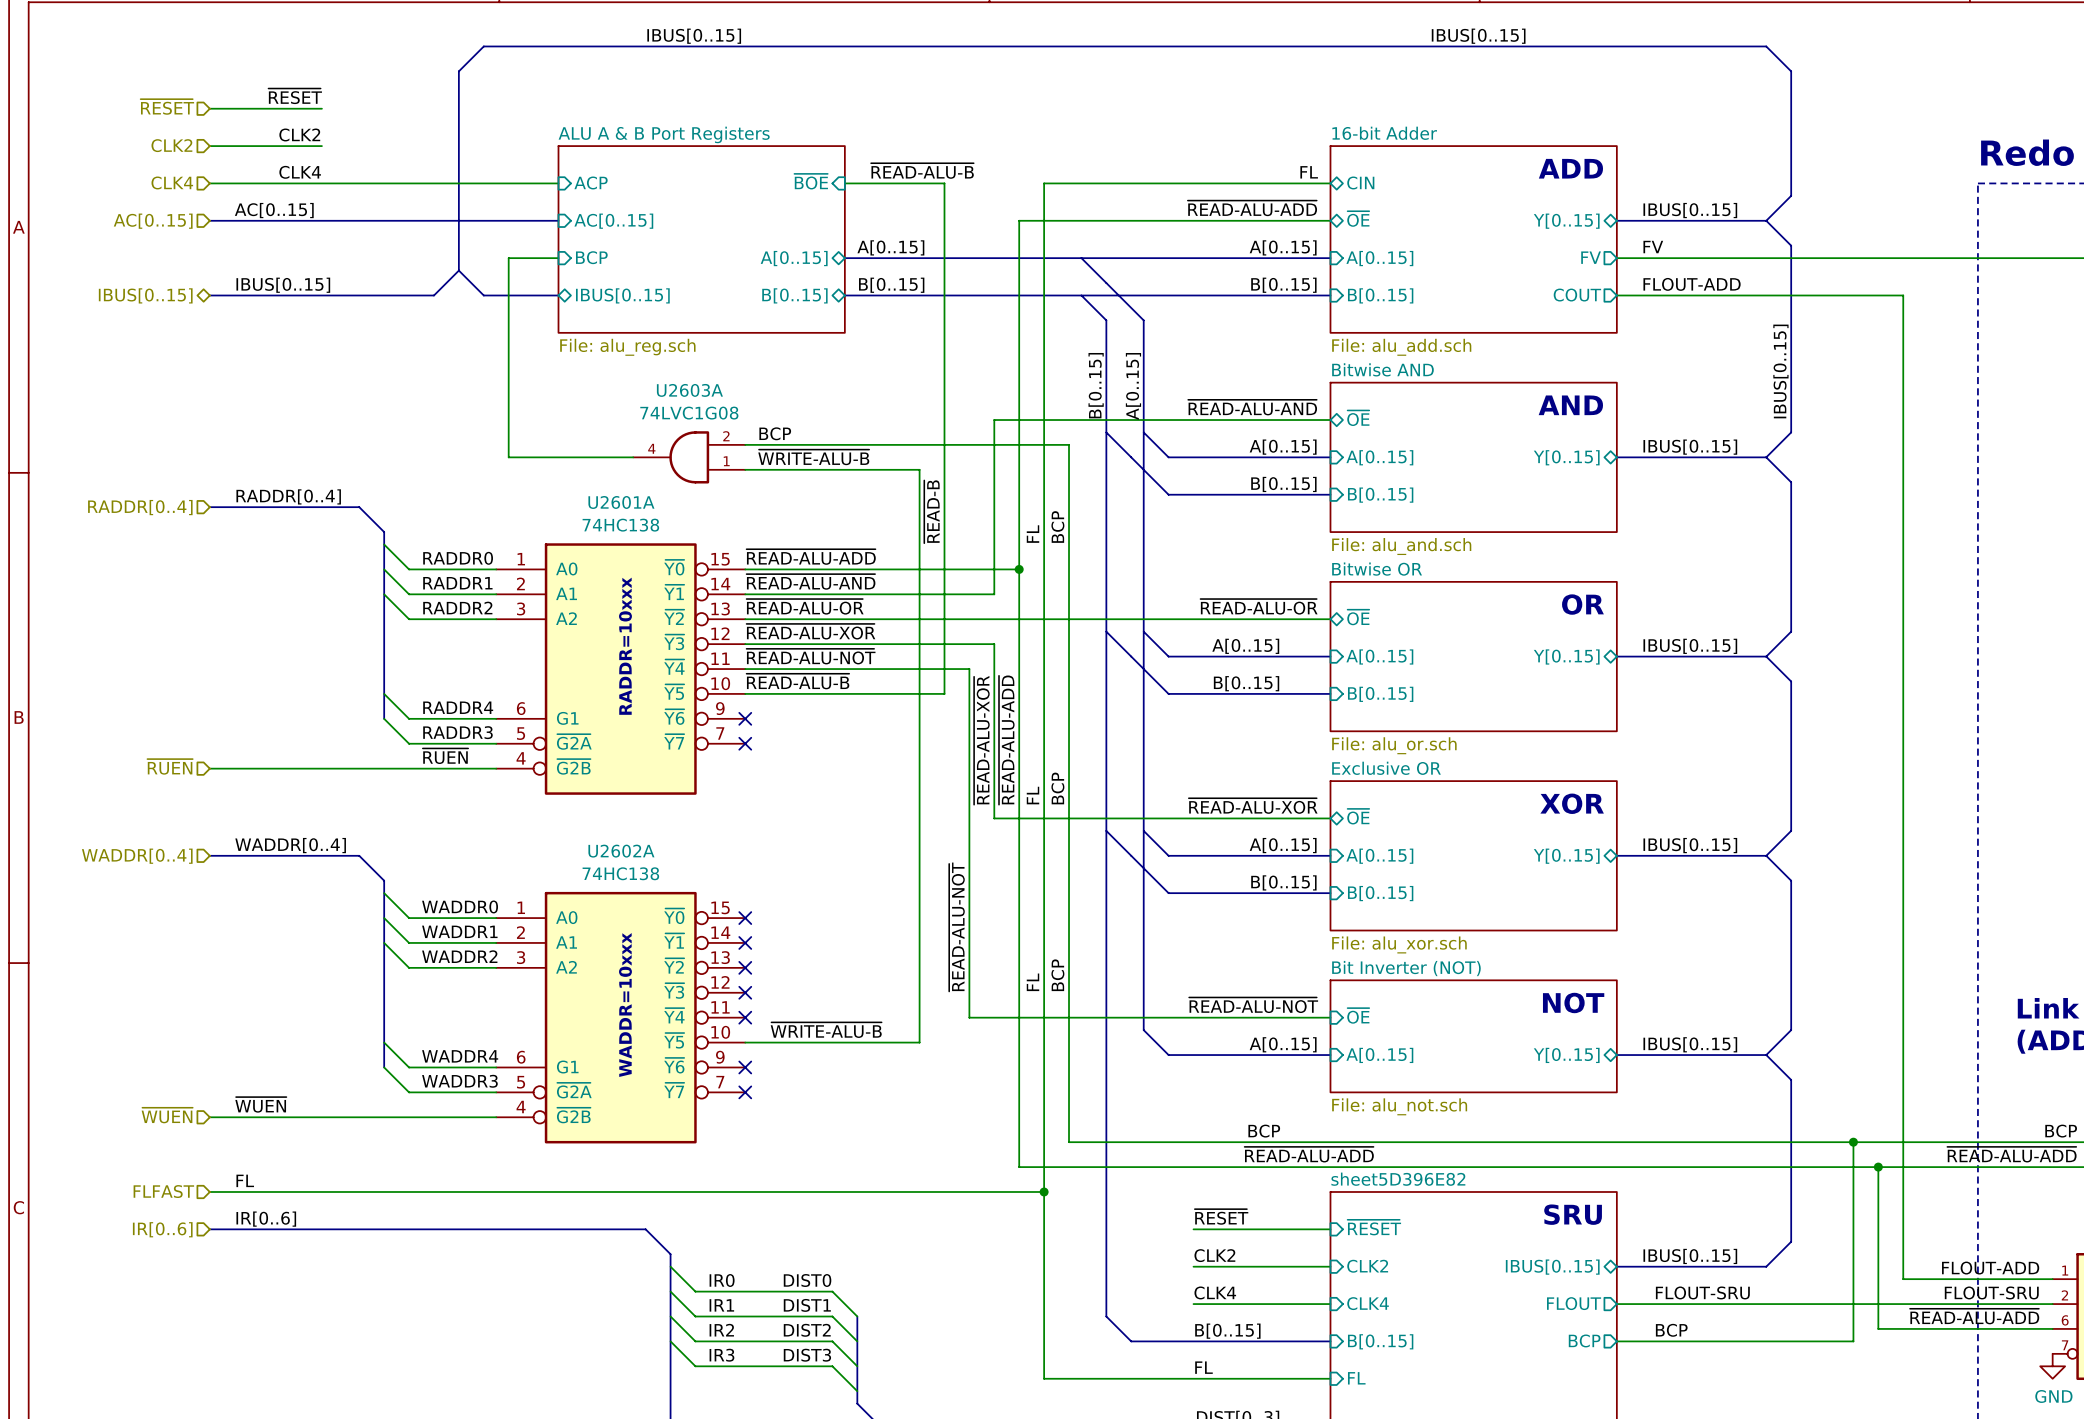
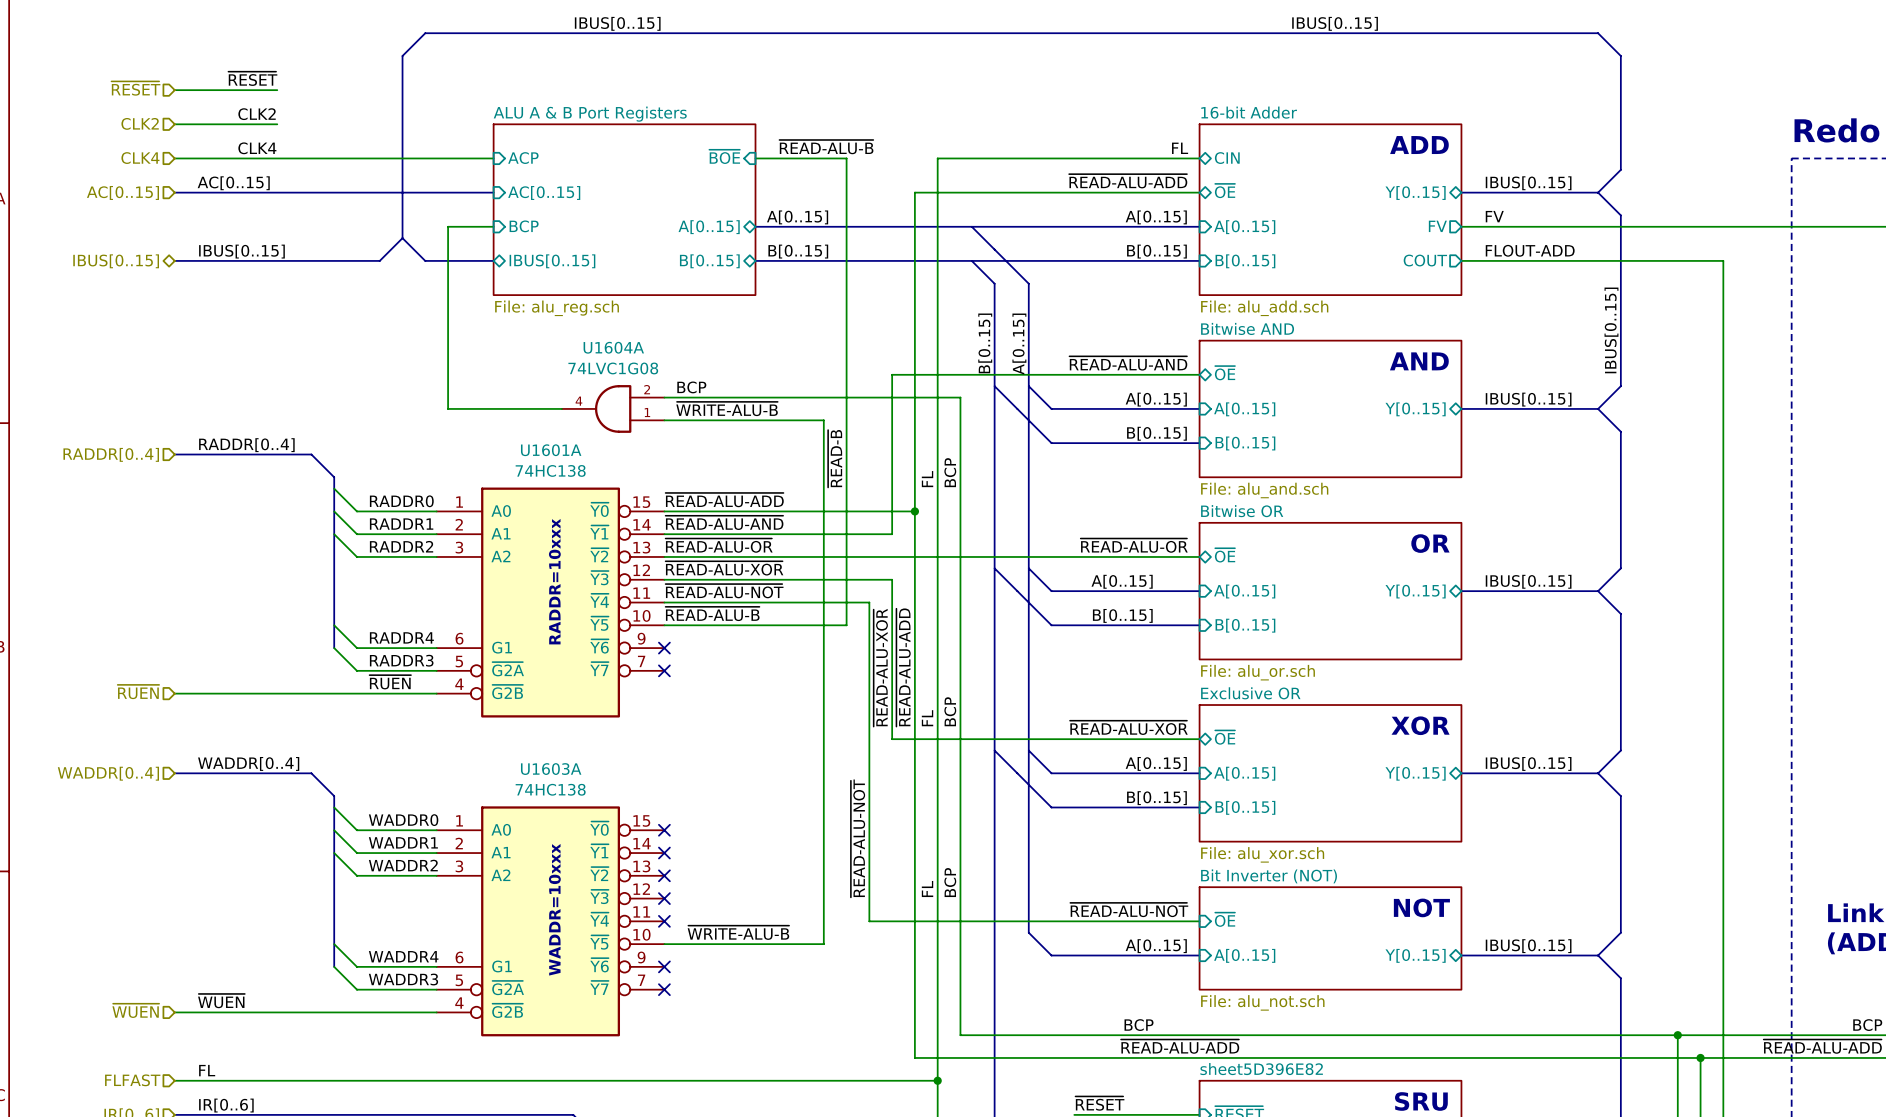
U2603A name: U2603A (689, 390) -> U1604A (613, 347)
U2601A name: U2601A (621, 502) -> U1601A (551, 450)
U2602A name: U2602A (621, 851) -> U1603A (551, 769)

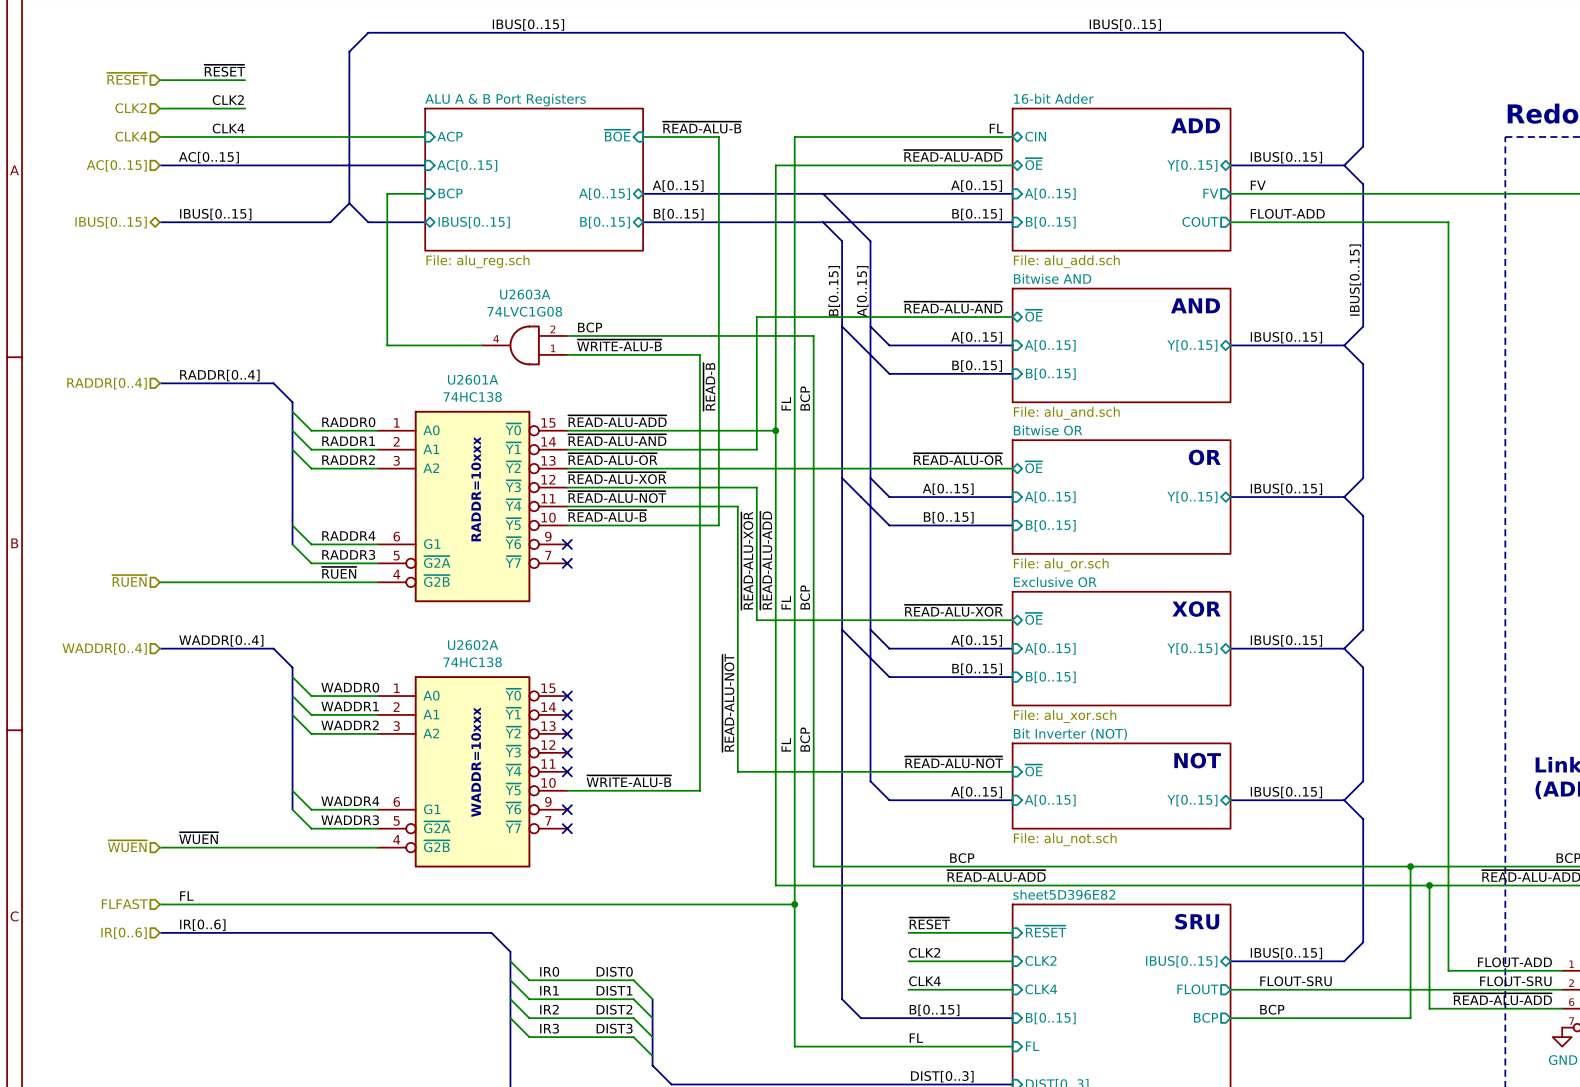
U1604A name: U1604A (613, 347) -> U2603A (525, 294)
U1601A name: U1601A (551, 450) -> U2601A (473, 379)
U1603A name: U1603A (551, 769) -> U2602A (473, 645)

